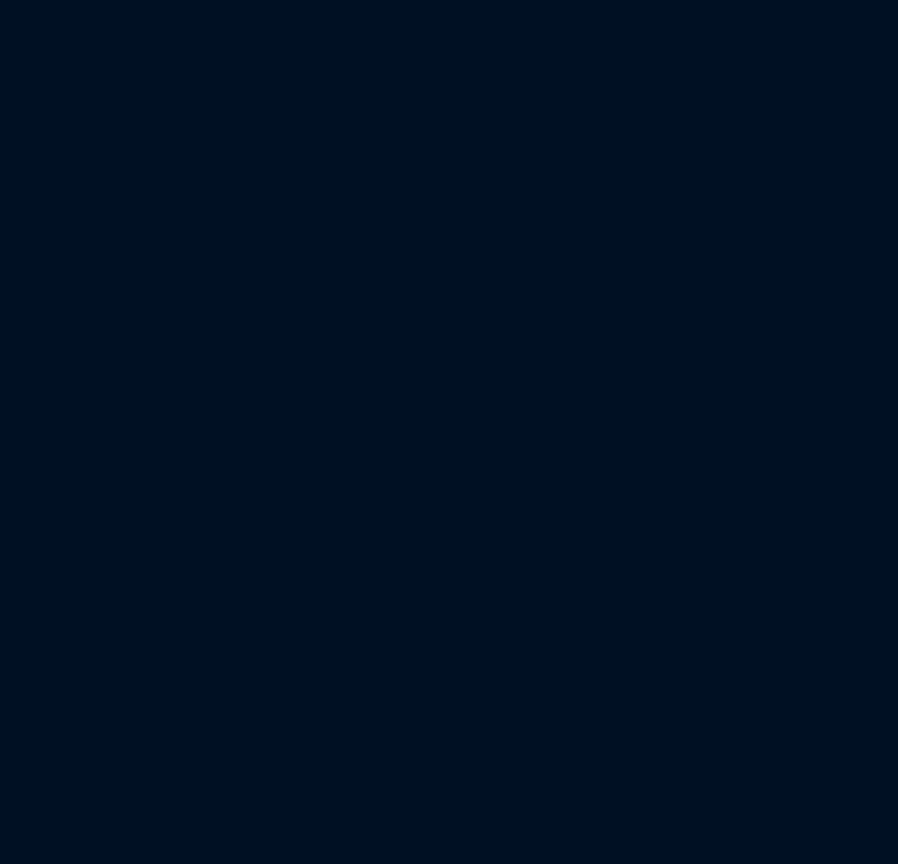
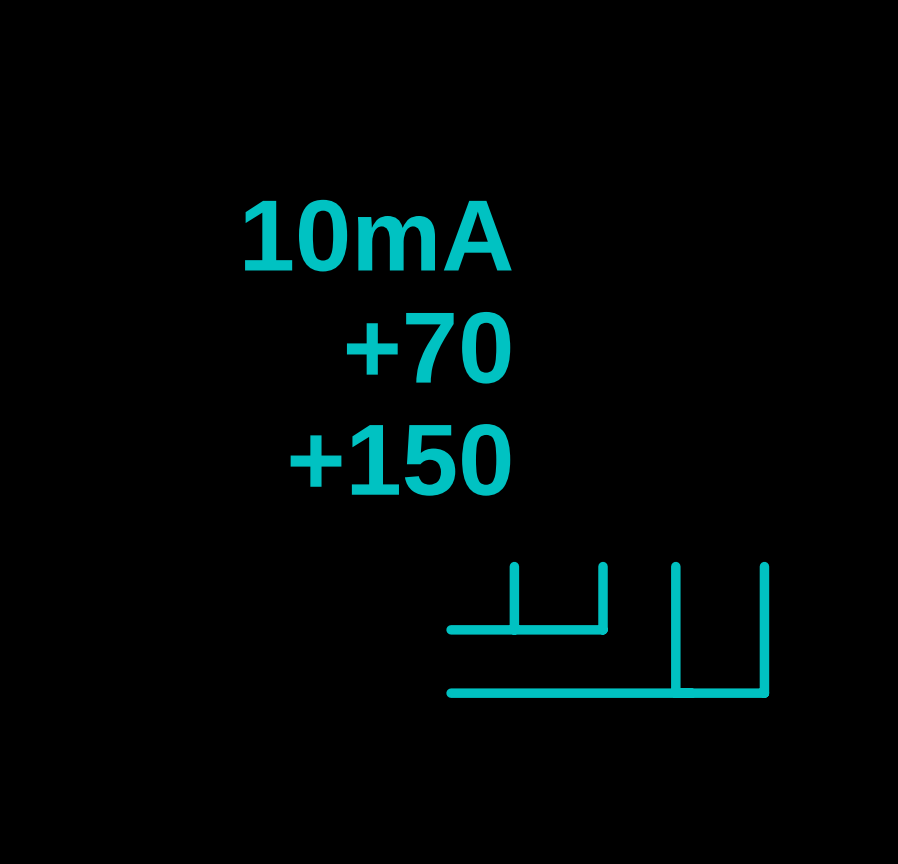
text: none -> 10mA (378, 235)
text: none -> +70 (428, 347)
text: none -> +150 (400, 459)
line: none -> (514, 566) (514, 629)
line: none -> (603, 566) (603, 629) (451, 629)
line: none -> (675, 566) (675, 693)
line: none -> (764, 566) (764, 693) (451, 693)

